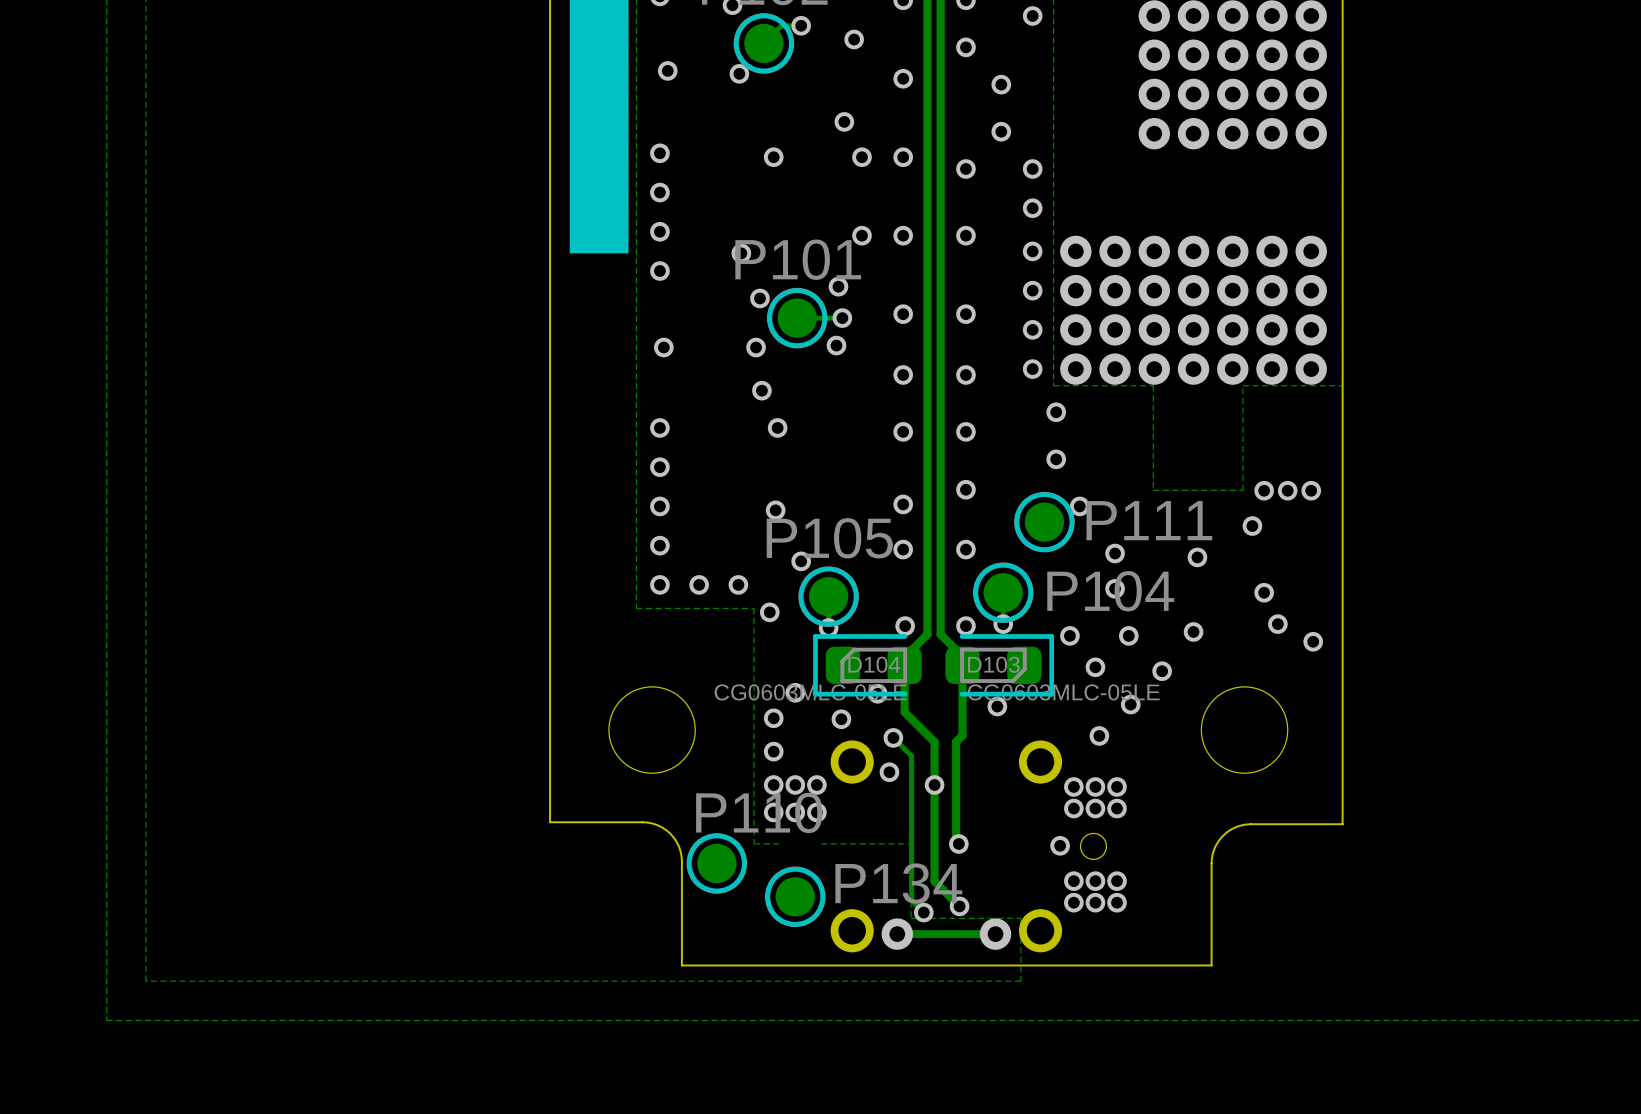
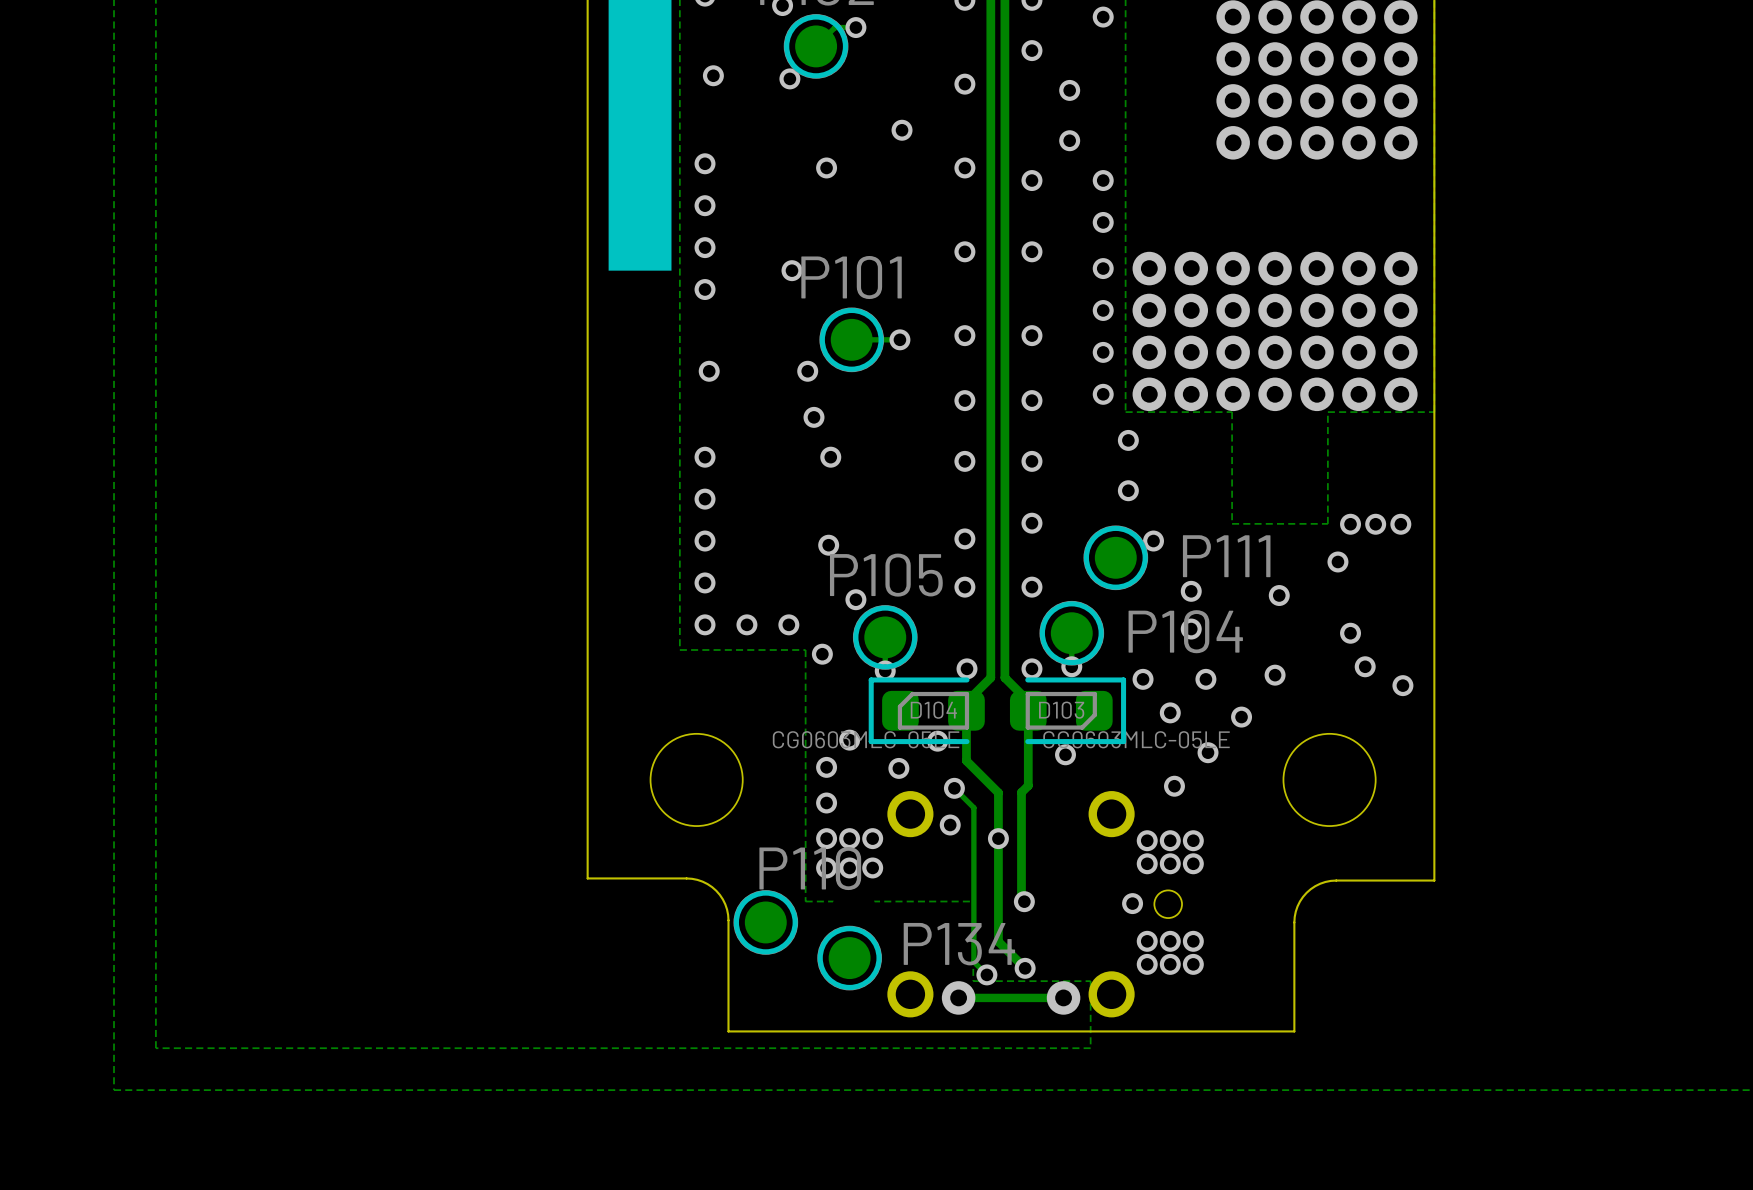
via: (854, 39) -> none
via: (861, 157) -> none
via: (861, 235) -> none
via: (838, 286) -> none
via: (759, 298) -> none
via: (836, 345) -> none

